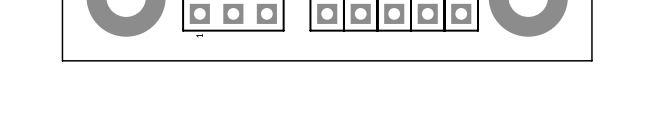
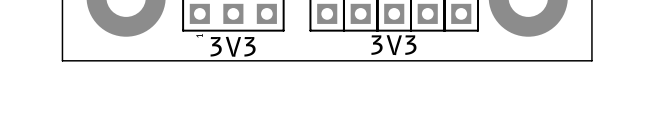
text: none -> 3V3 (393, 45)
text: none -> 3V3 (233, 46)

